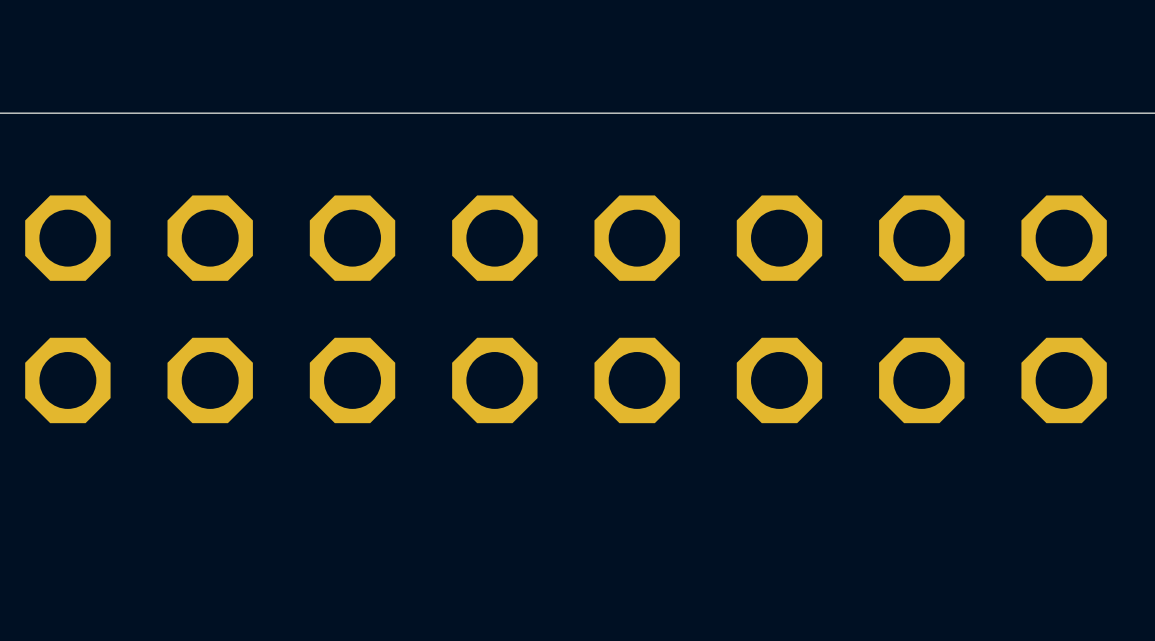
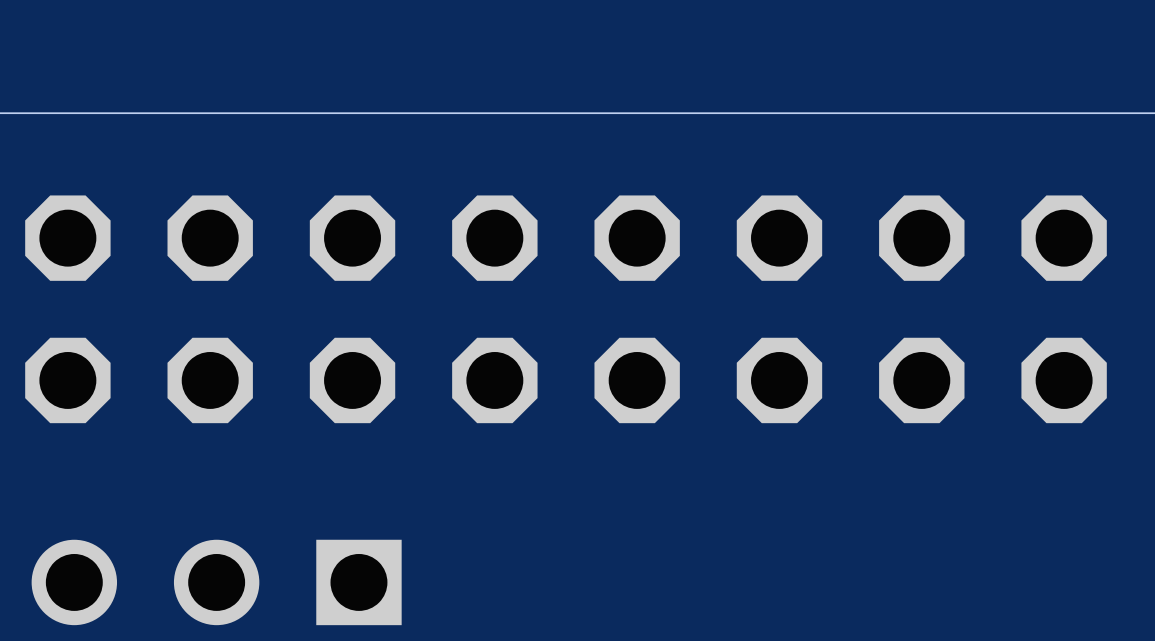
part: none -> (216, 582)

